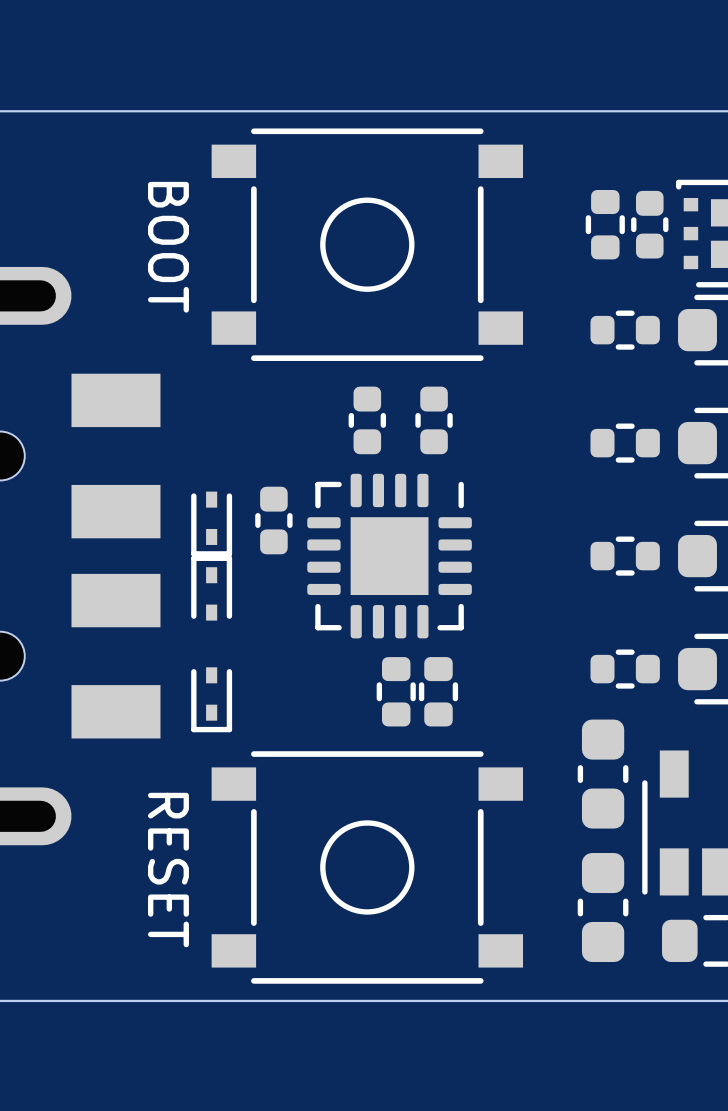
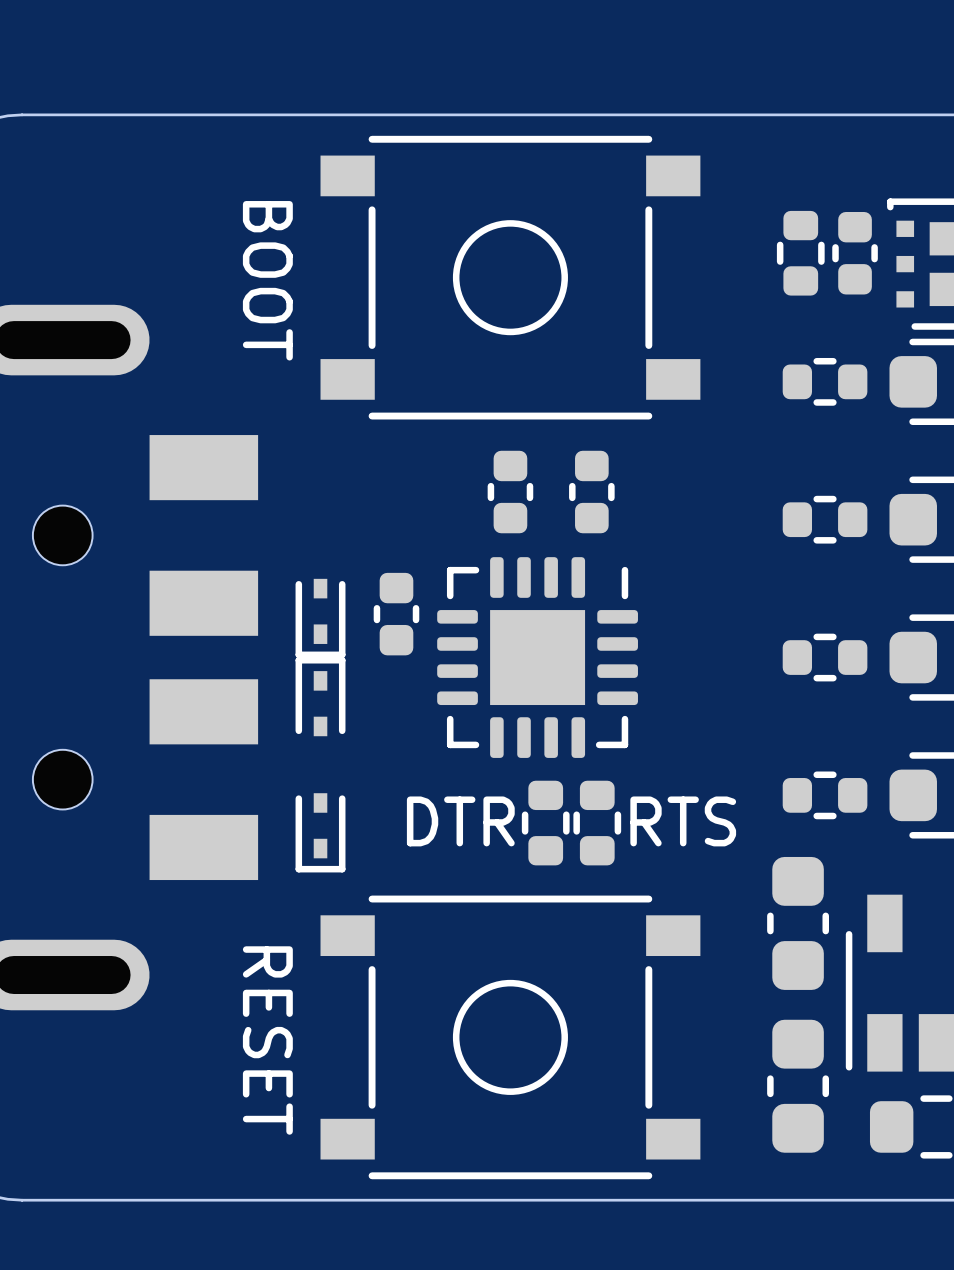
text: none -> DTR (460, 821)
text: none -> RTS (683, 821)

